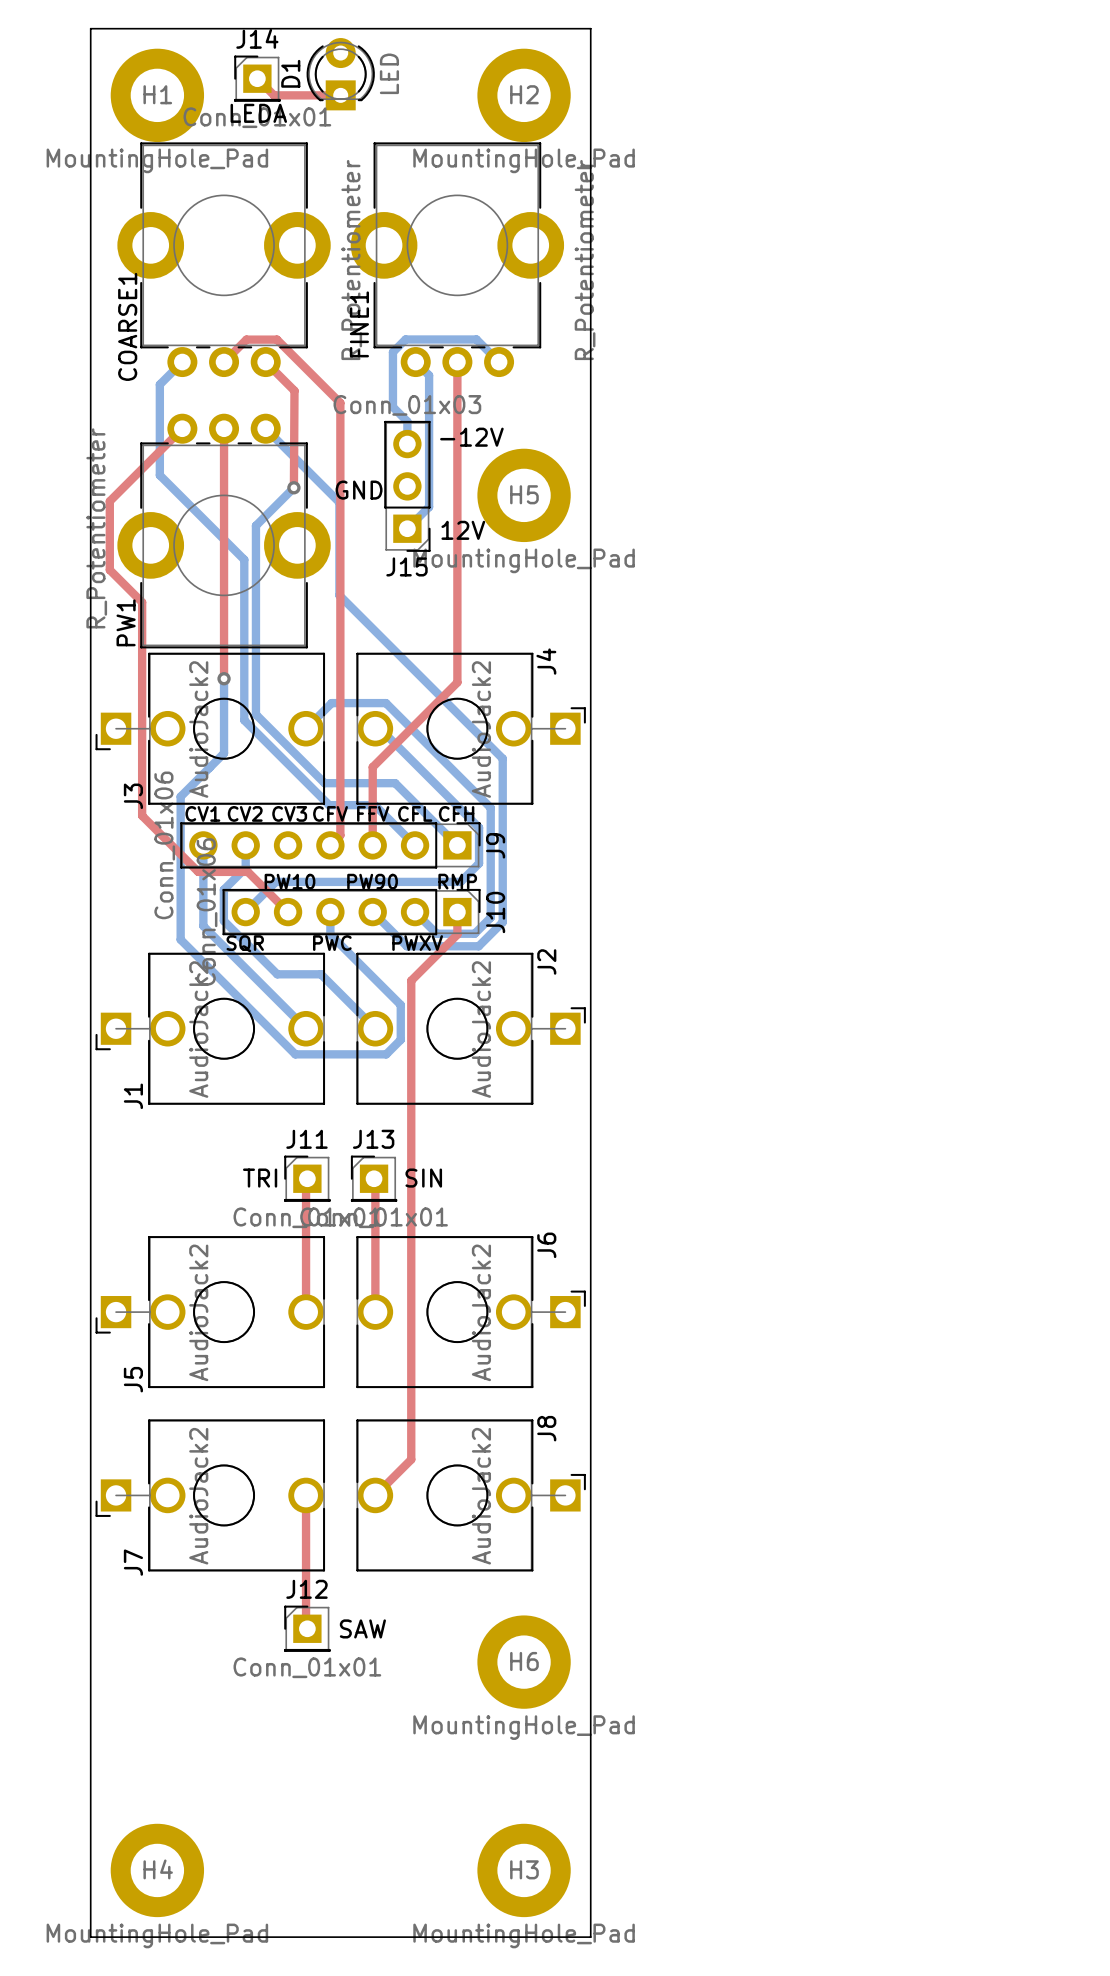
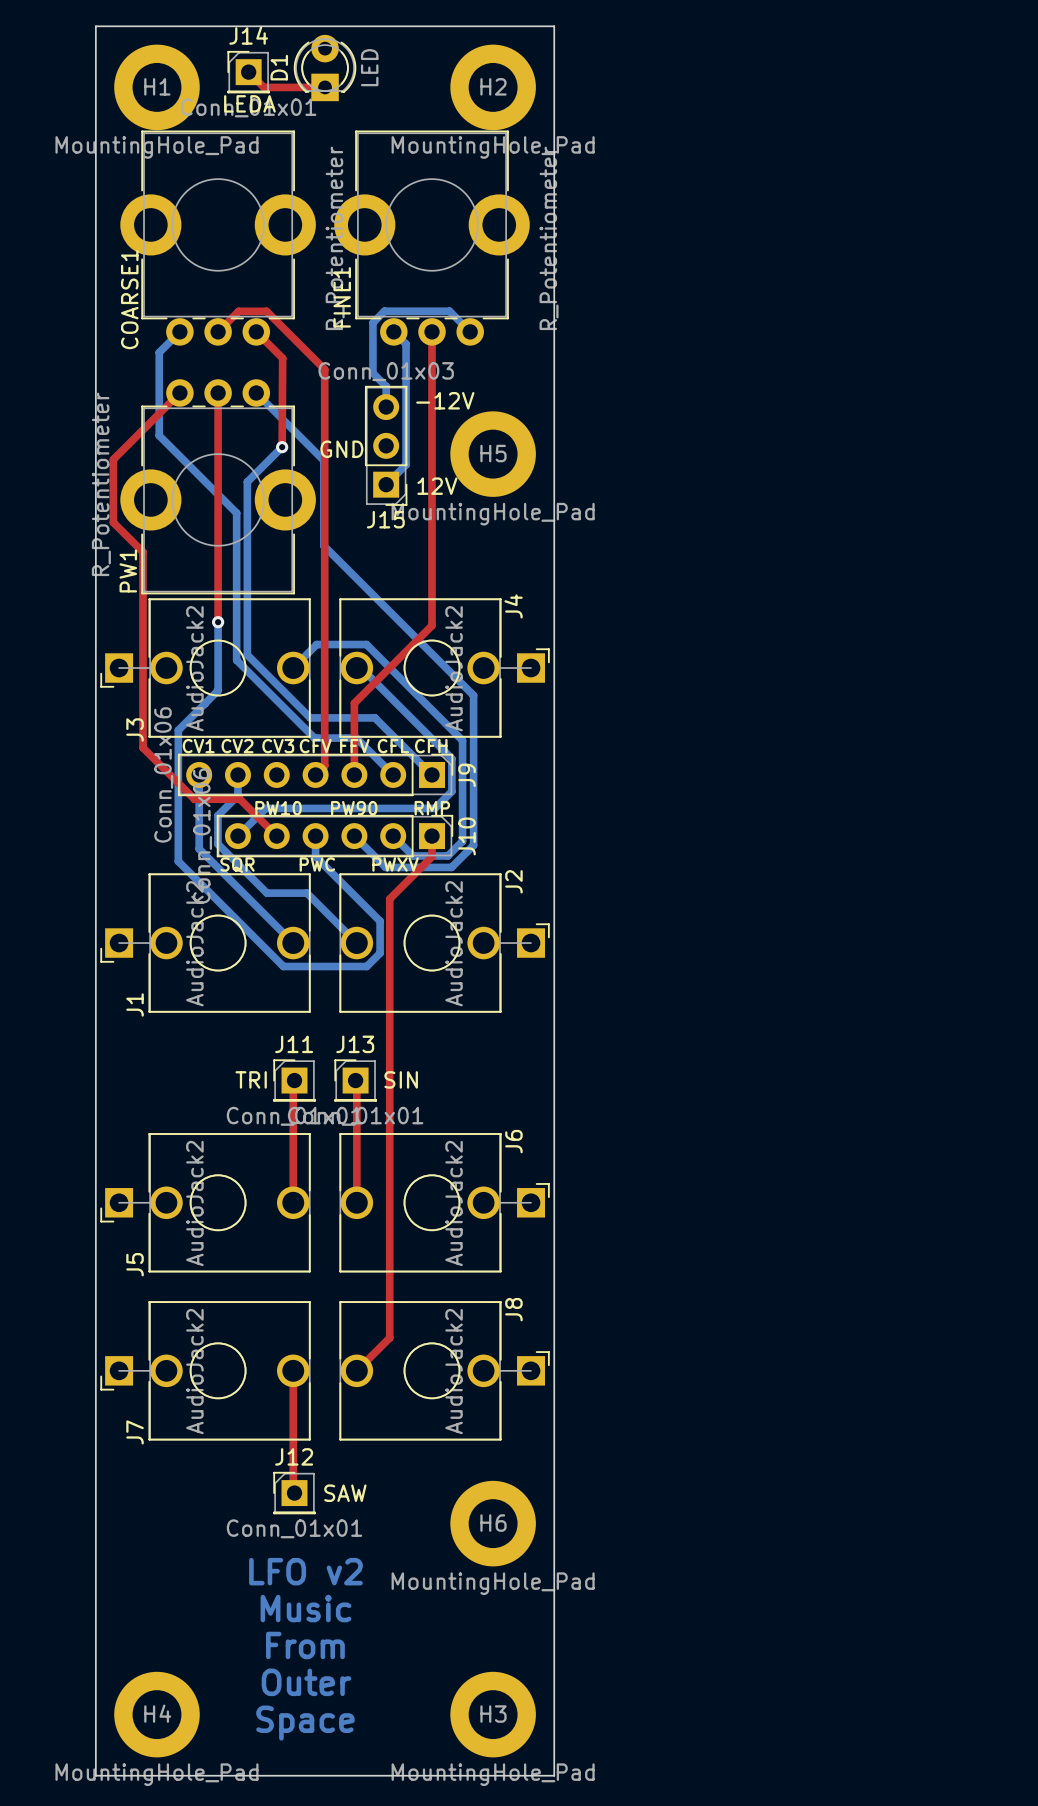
text: none -> LFO v2 (305, 1571)
text: none -> Music (305, 1608)
text: none -> From (305, 1645)
text: none -> Outer (306, 1682)
text: none -> Space (305, 1723)

